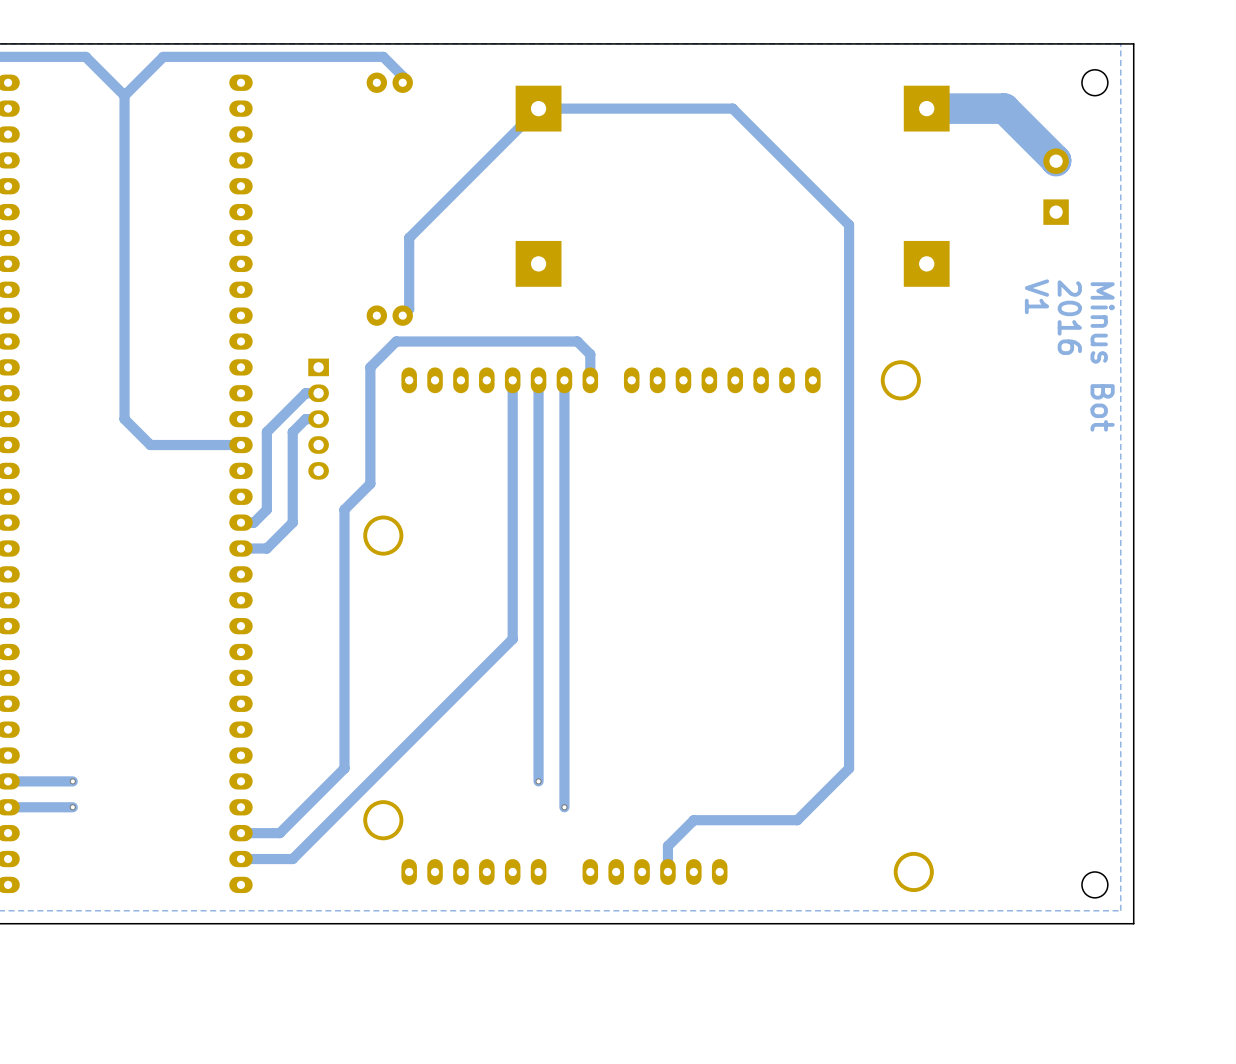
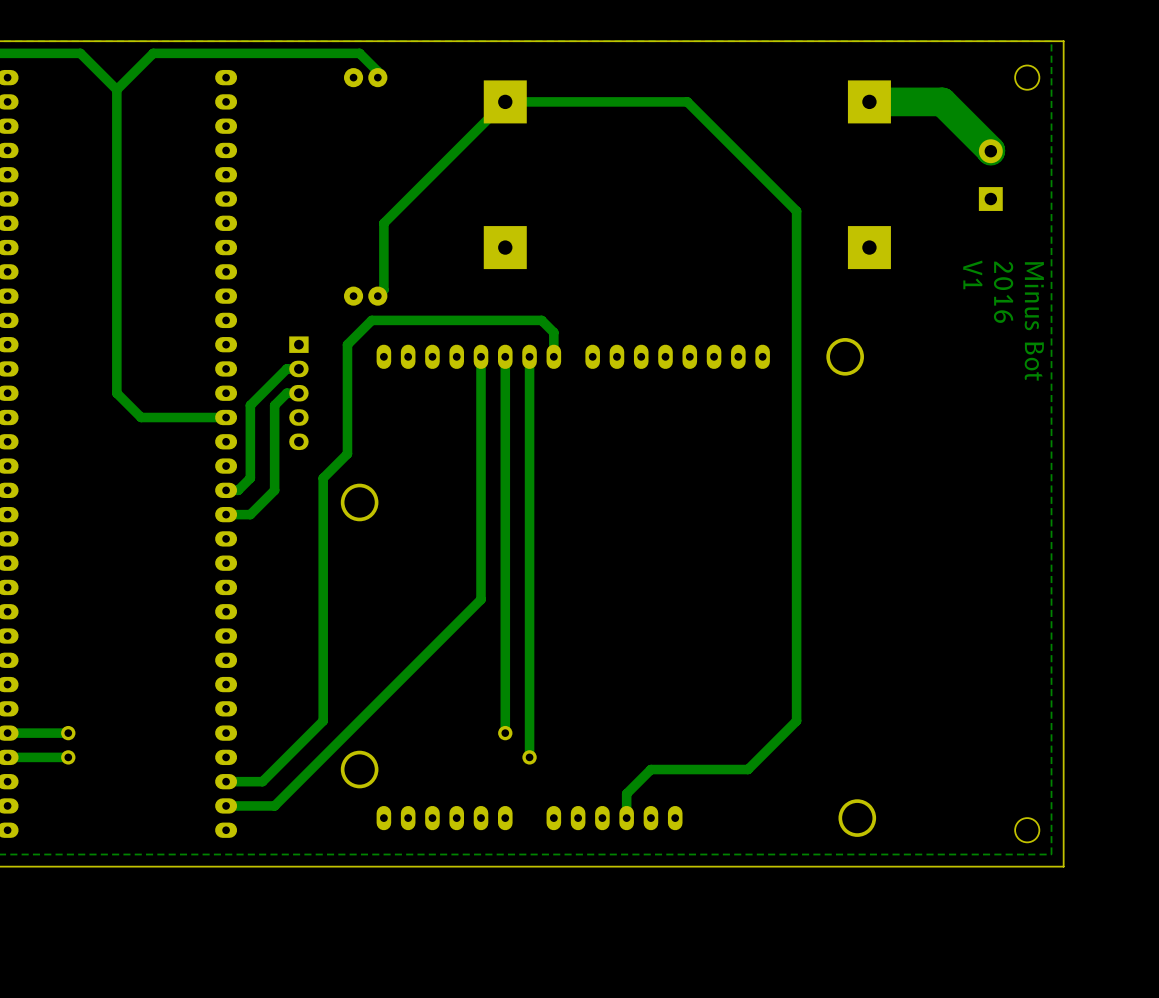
part: none -> (68, 733)
part: none -> (505, 733)
part: none -> (68, 757)
part: none -> (529, 757)

